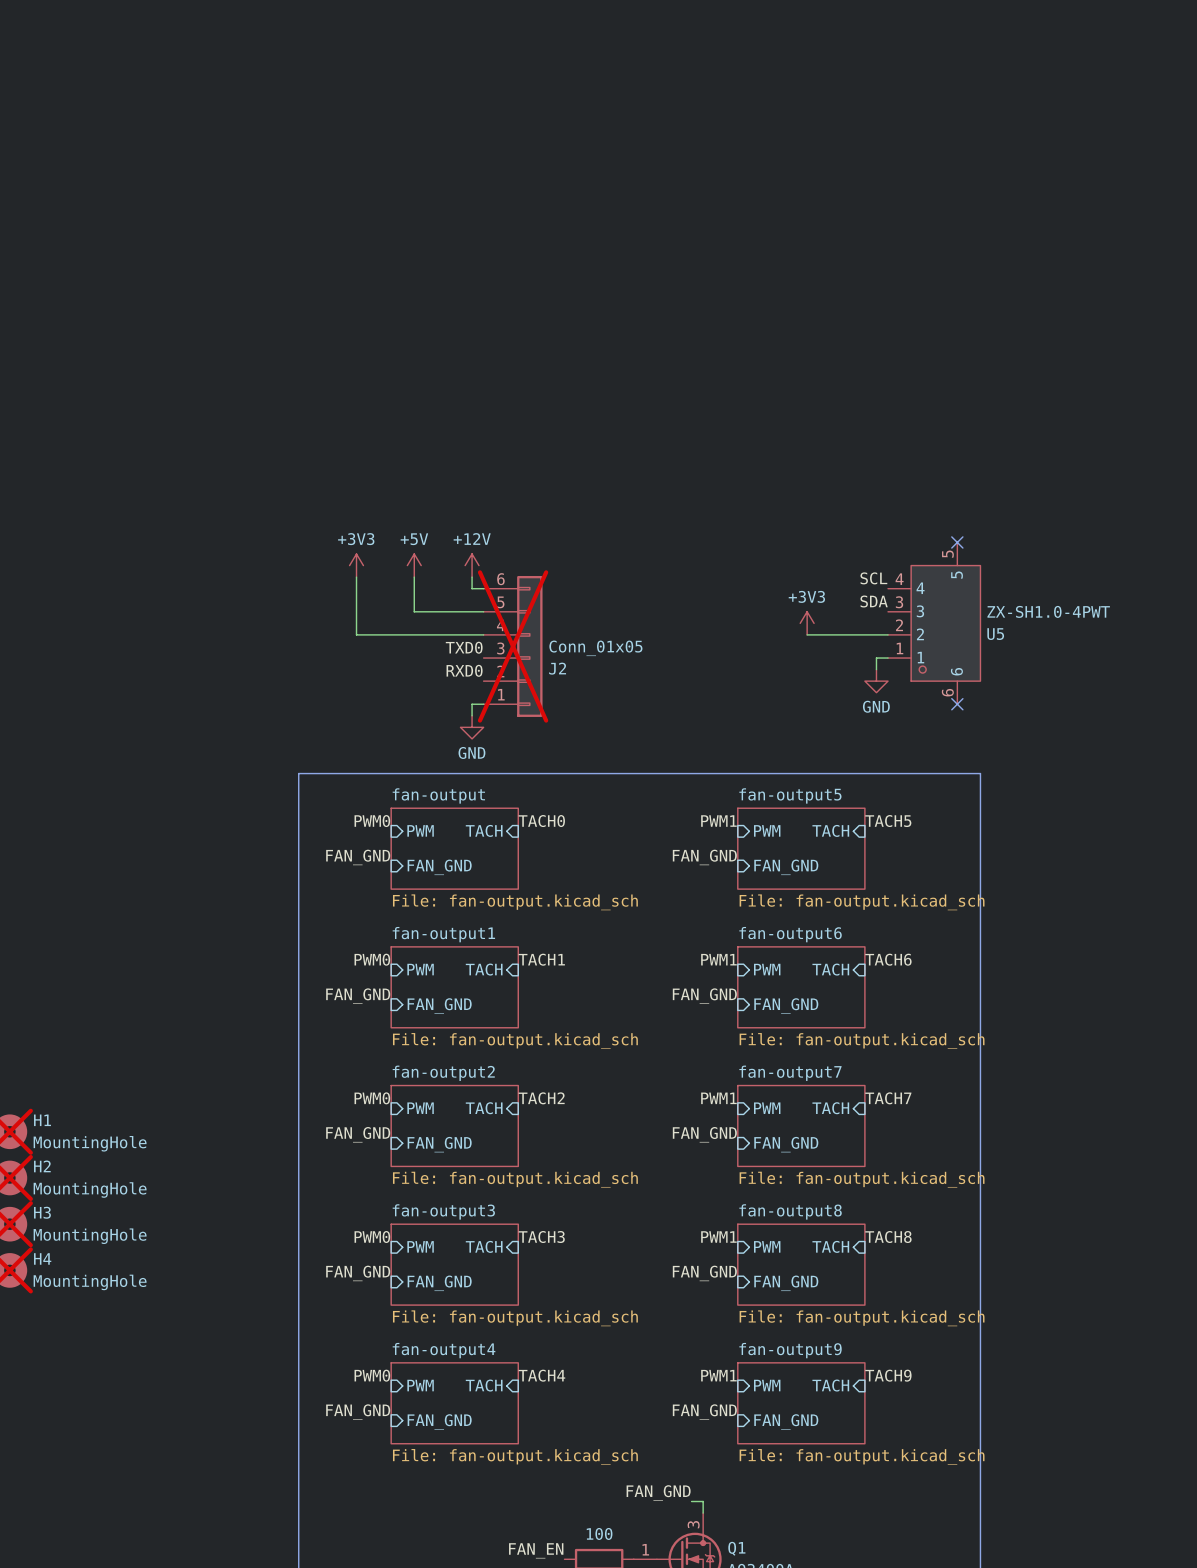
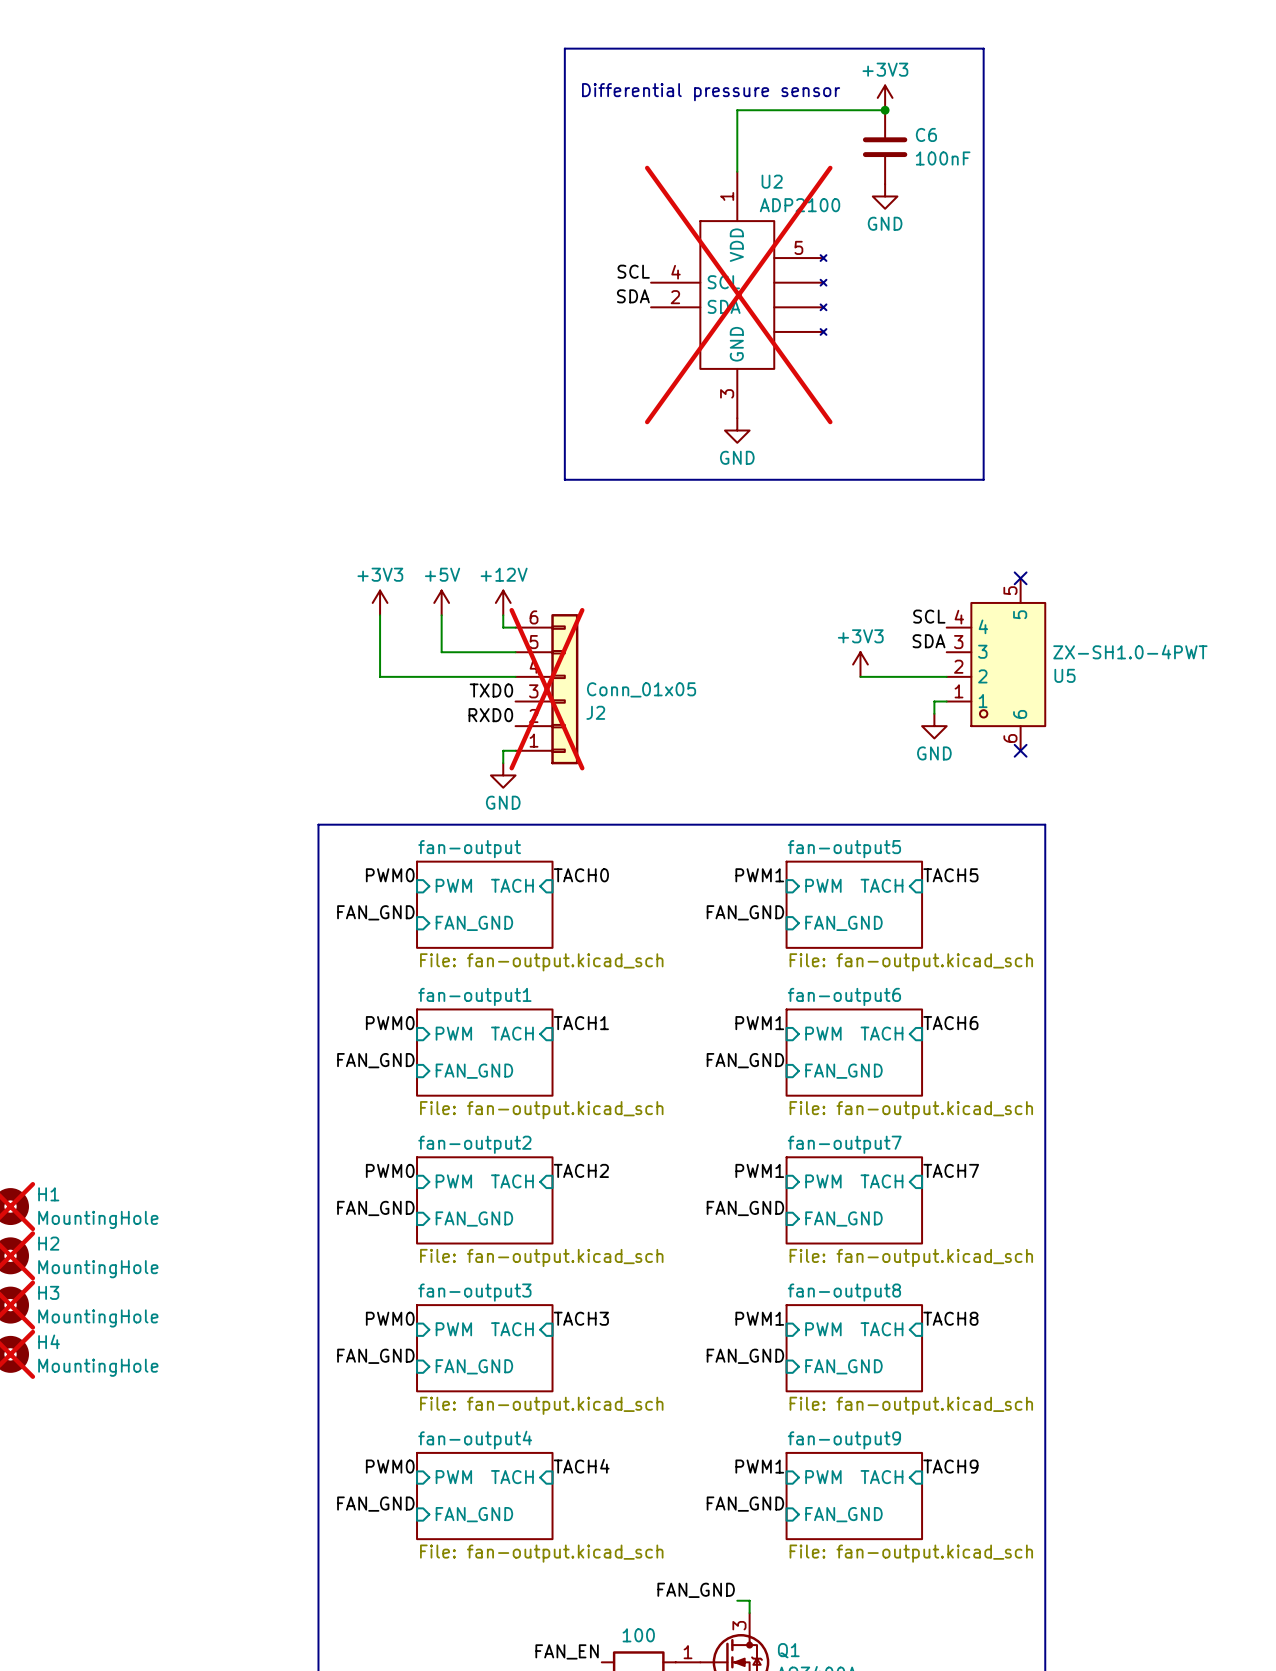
line: none -> (564, 48) (564, 479) (983, 479) (983, 48) (564, 48)
text: none -> Differential pressure sensor (711, 92)
power symbol: none -> +3V3 (885, 97)
wire: none -> (885, 110) (737, 110) (737, 171)
junction: none -> (885, 110)
C6: none -> 100nF (885, 147)
power symbol: none -> GND (885, 196)
label: none -> SCL (633, 271)
U2: none -> ADP2100 (738, 295)
label: none -> SDA (633, 296)
power symbol: none -> GND (737, 430)

